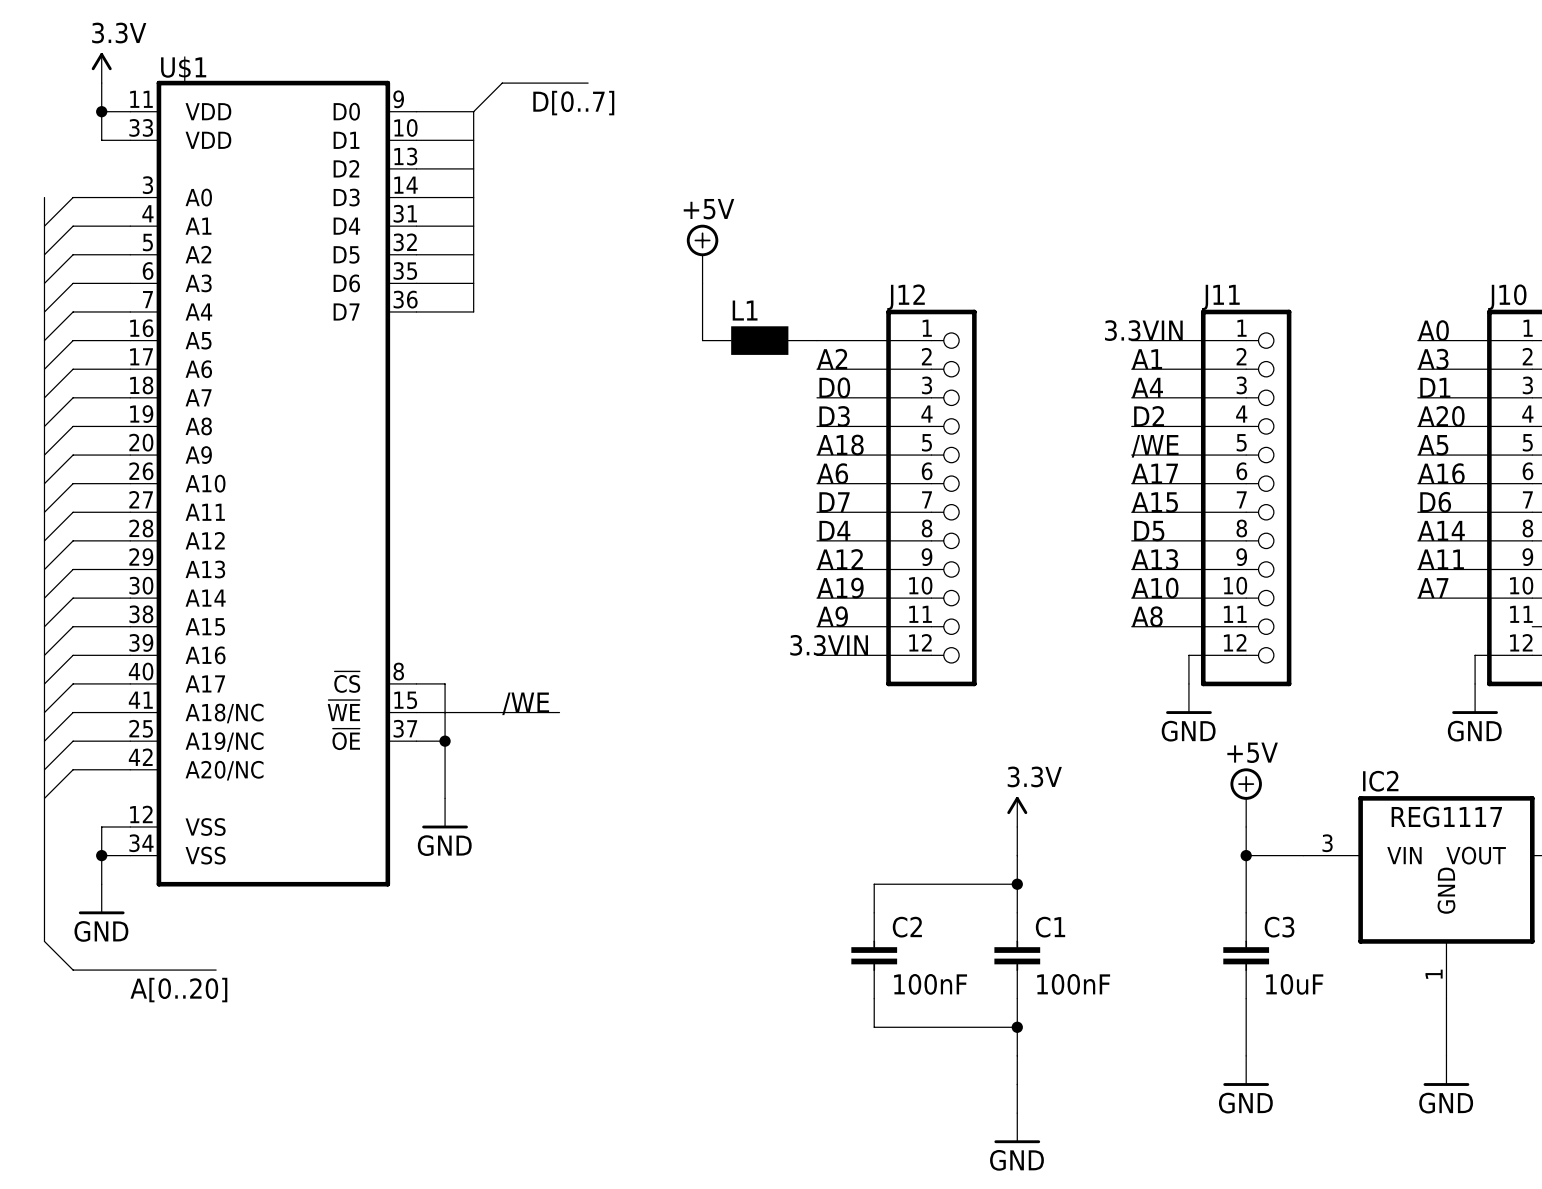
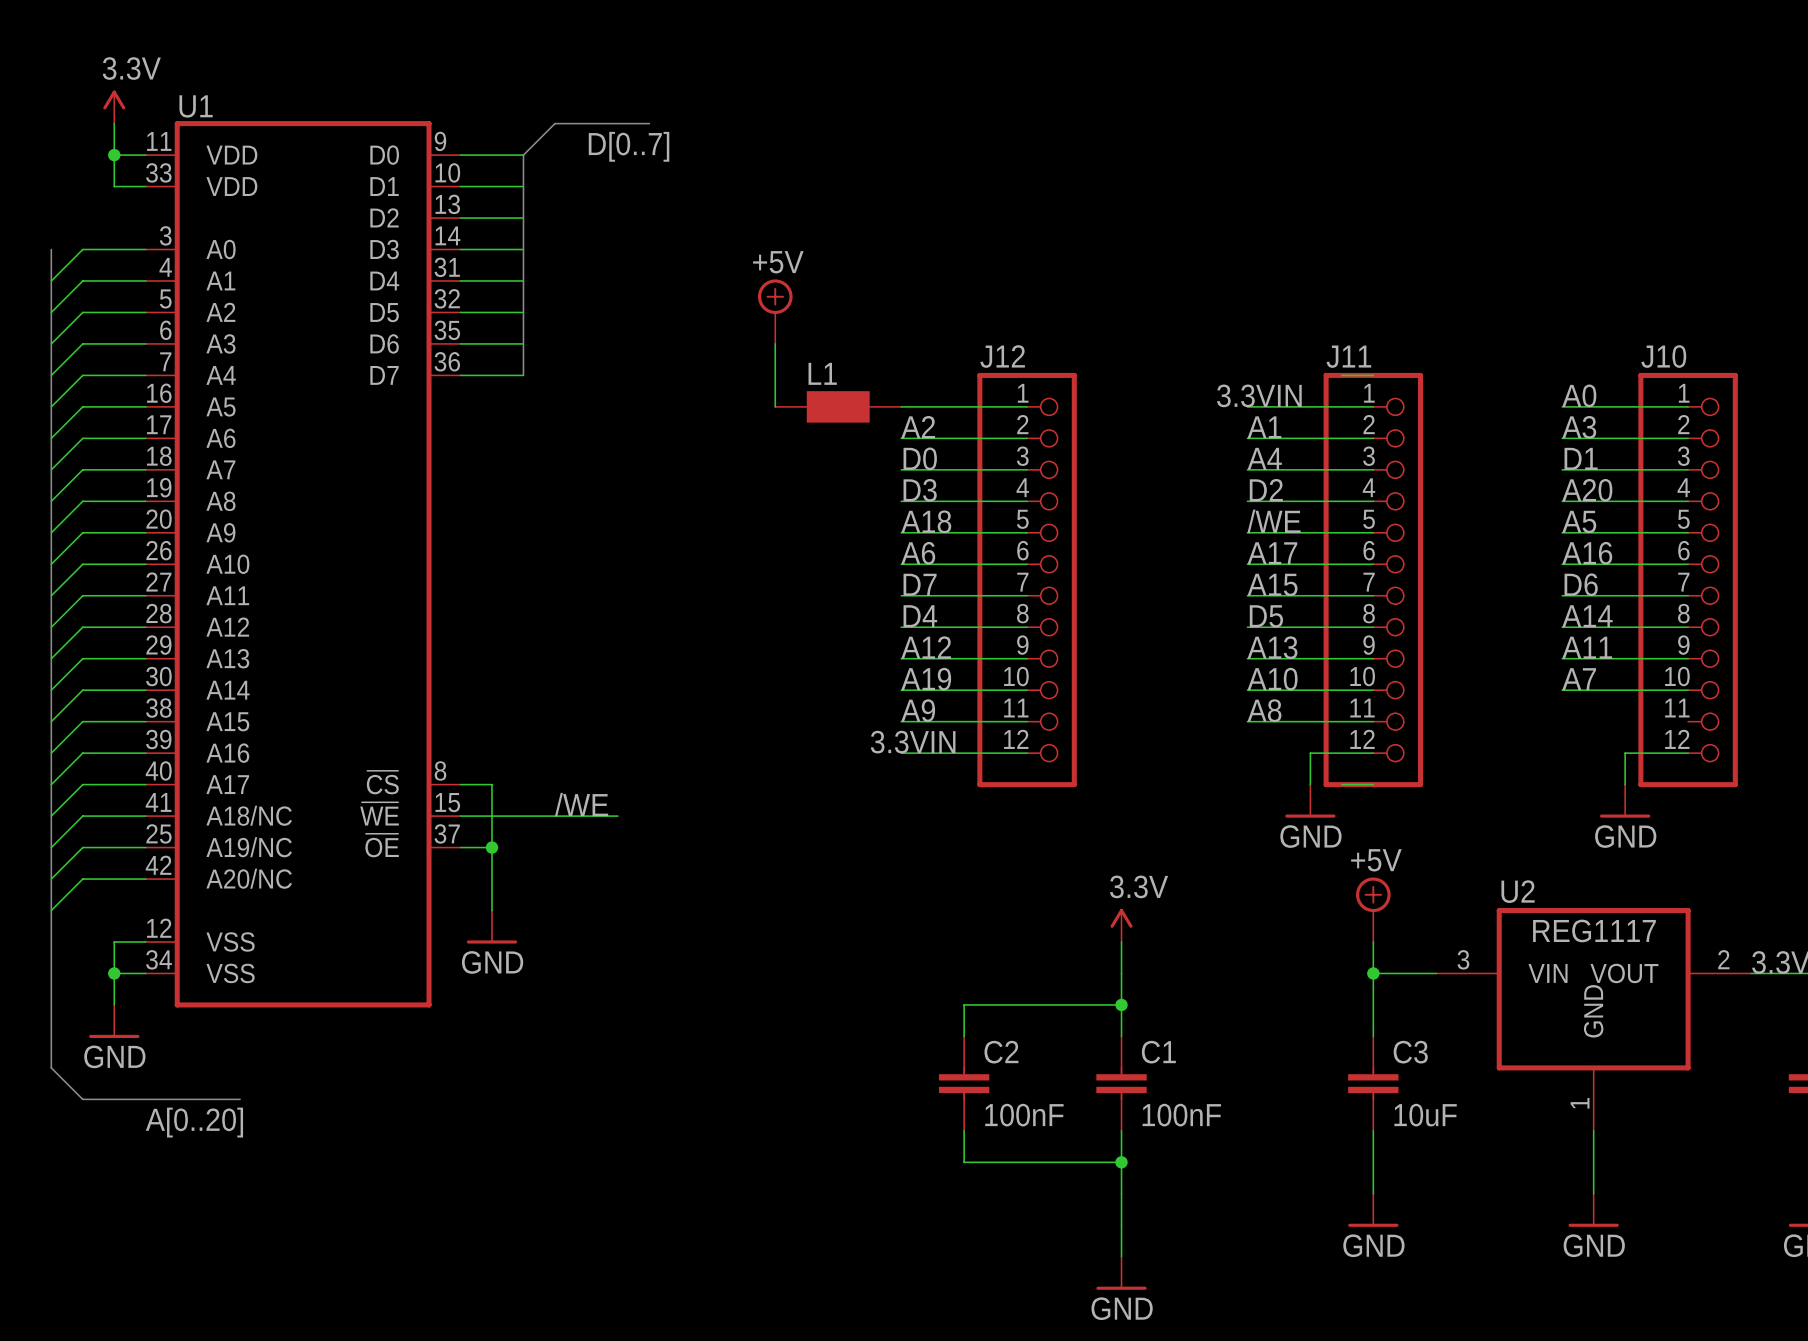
U$1 name: U$1 (183, 68) -> U1 (196, 106)
IC2 name: IC2 (1380, 781) -> U2 (1518, 891)

